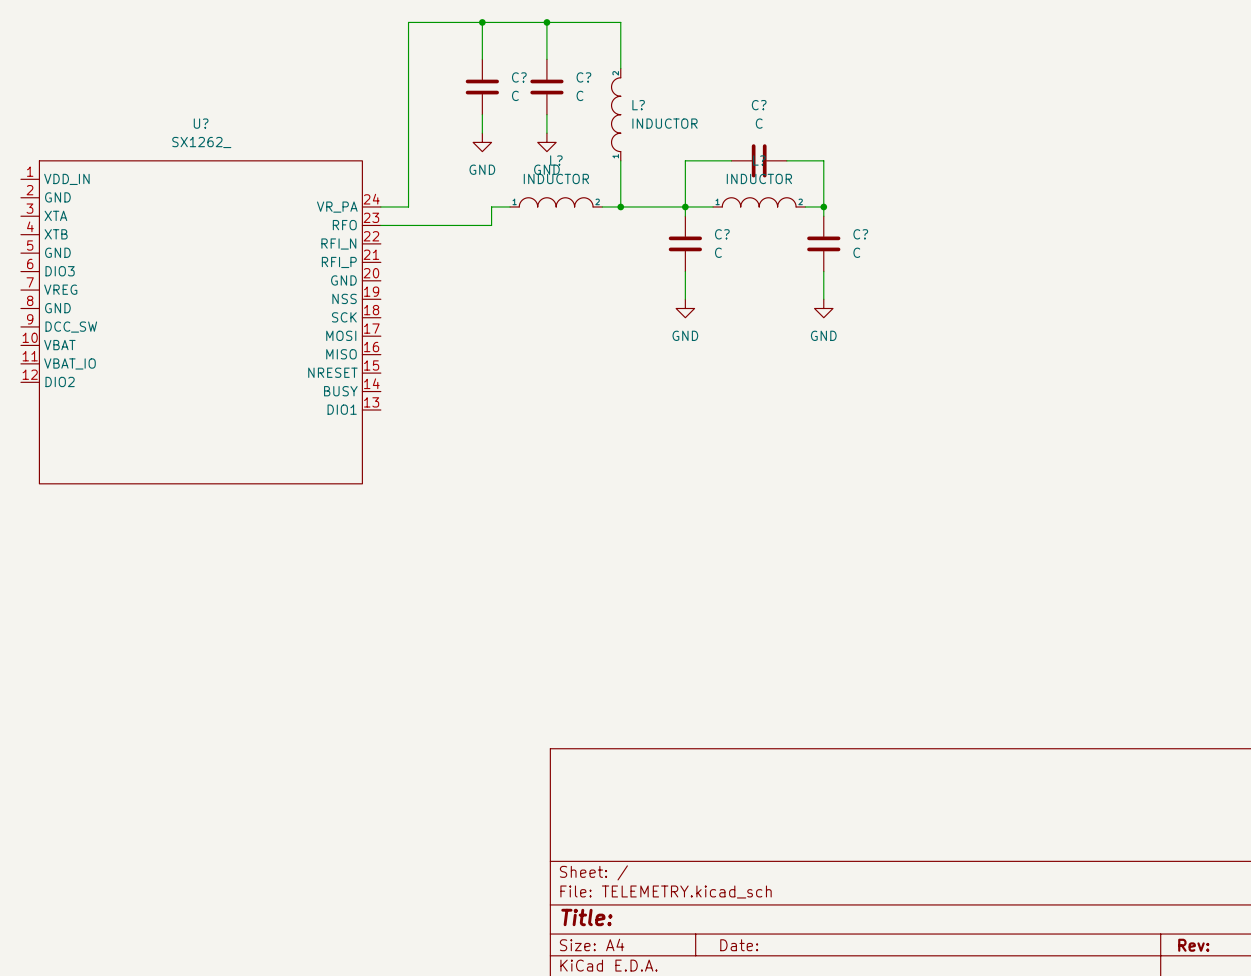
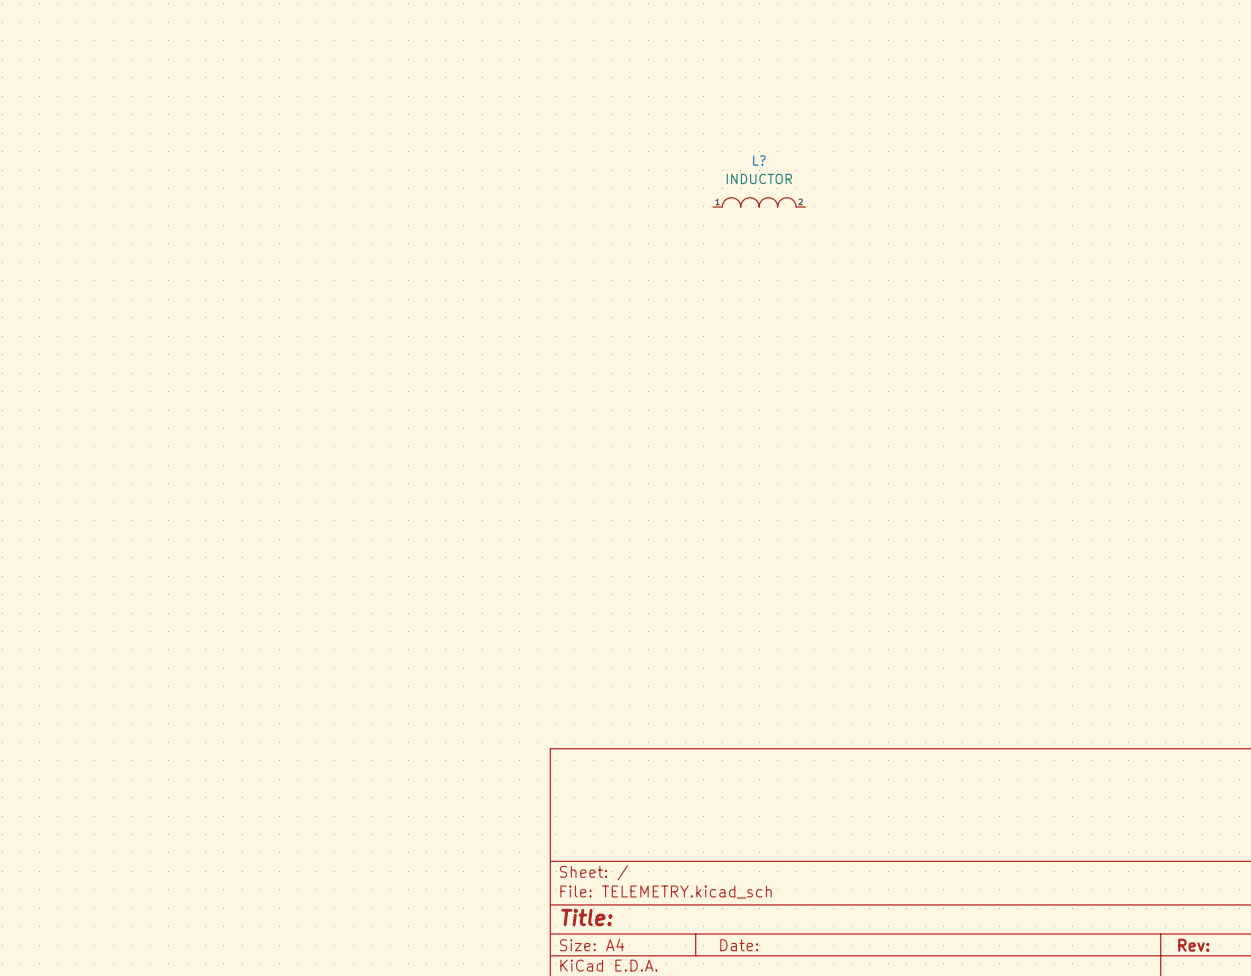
wire: (482, 22) (482, 59) -> none
junction: (482, 22) -> none
wire: (546, 22) (546, 59) -> none
junction: (546, 22) -> none
wire: (620, 68) (620, 22) (408, 22) (408, 206) (380, 206) -> none
C?: C (482, 87) -> none
C?: C (546, 87) -> none
wire: (482, 114) (482, 133) -> none
wire: (546, 114) (546, 133) -> none
L?: INDUCTOR (616, 114) -> none
power symbol: GND (482, 142) -> none
power symbol: GND (546, 142) -> none
wire: (620, 160) (620, 206) -> none
wire: (731, 160) (685, 160) (685, 216) -> none
C?: C (759, 160) -> none
wire: (786, 160) (823, 160) (823, 216) -> none
L?: INDUCTOR (556, 202) -> none
wire: (510, 206) (491, 206) (491, 225) (380, 225) -> none
wire: (602, 206) (713, 206) -> none
junction: (620, 206) -> none
junction: (685, 206) -> none
wire: (805, 206) (823, 206) -> none
junction: (823, 206) -> none
C?: C (685, 243) -> none
C?: C (823, 243) -> none
wire: (685, 271) (685, 299) -> none
wire: (823, 271) (823, 299) -> none
power symbol: GND (685, 308) -> none
power symbol: GND (823, 308) -> none
U?: SX1262_ (200, 322) -> none

